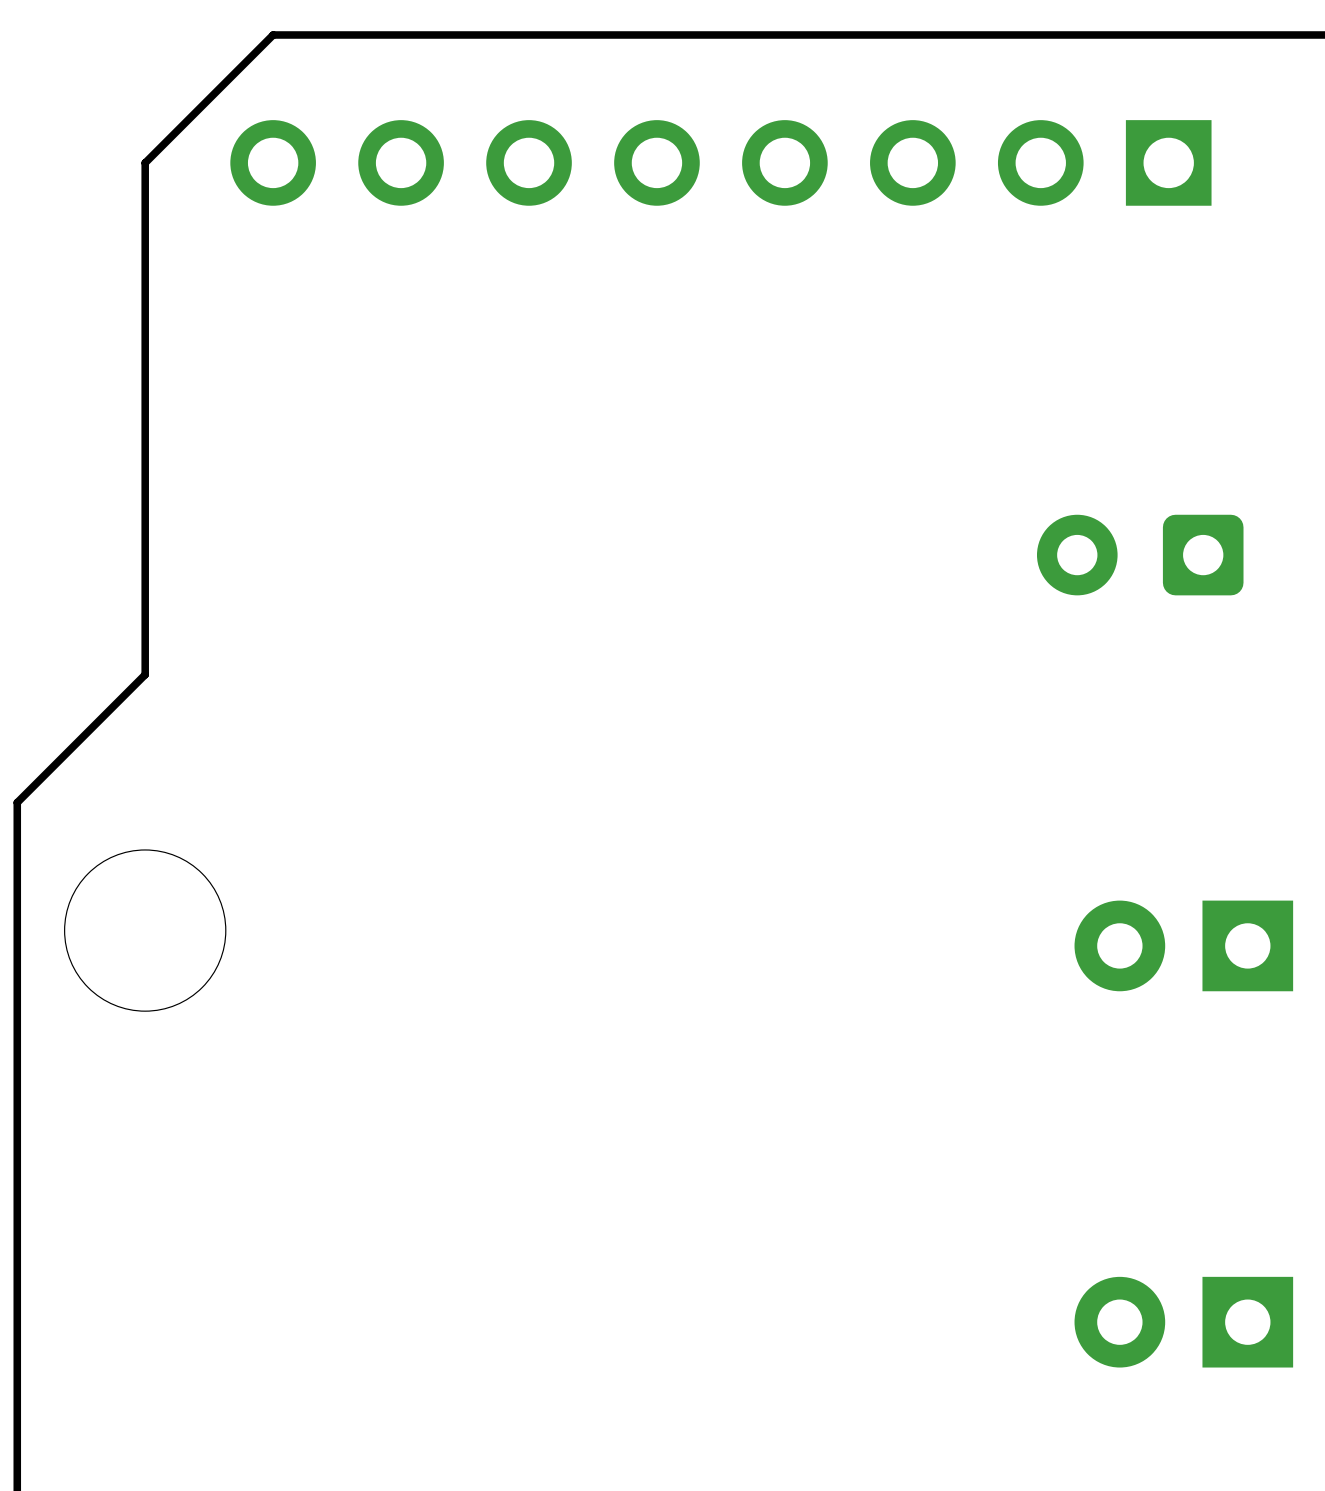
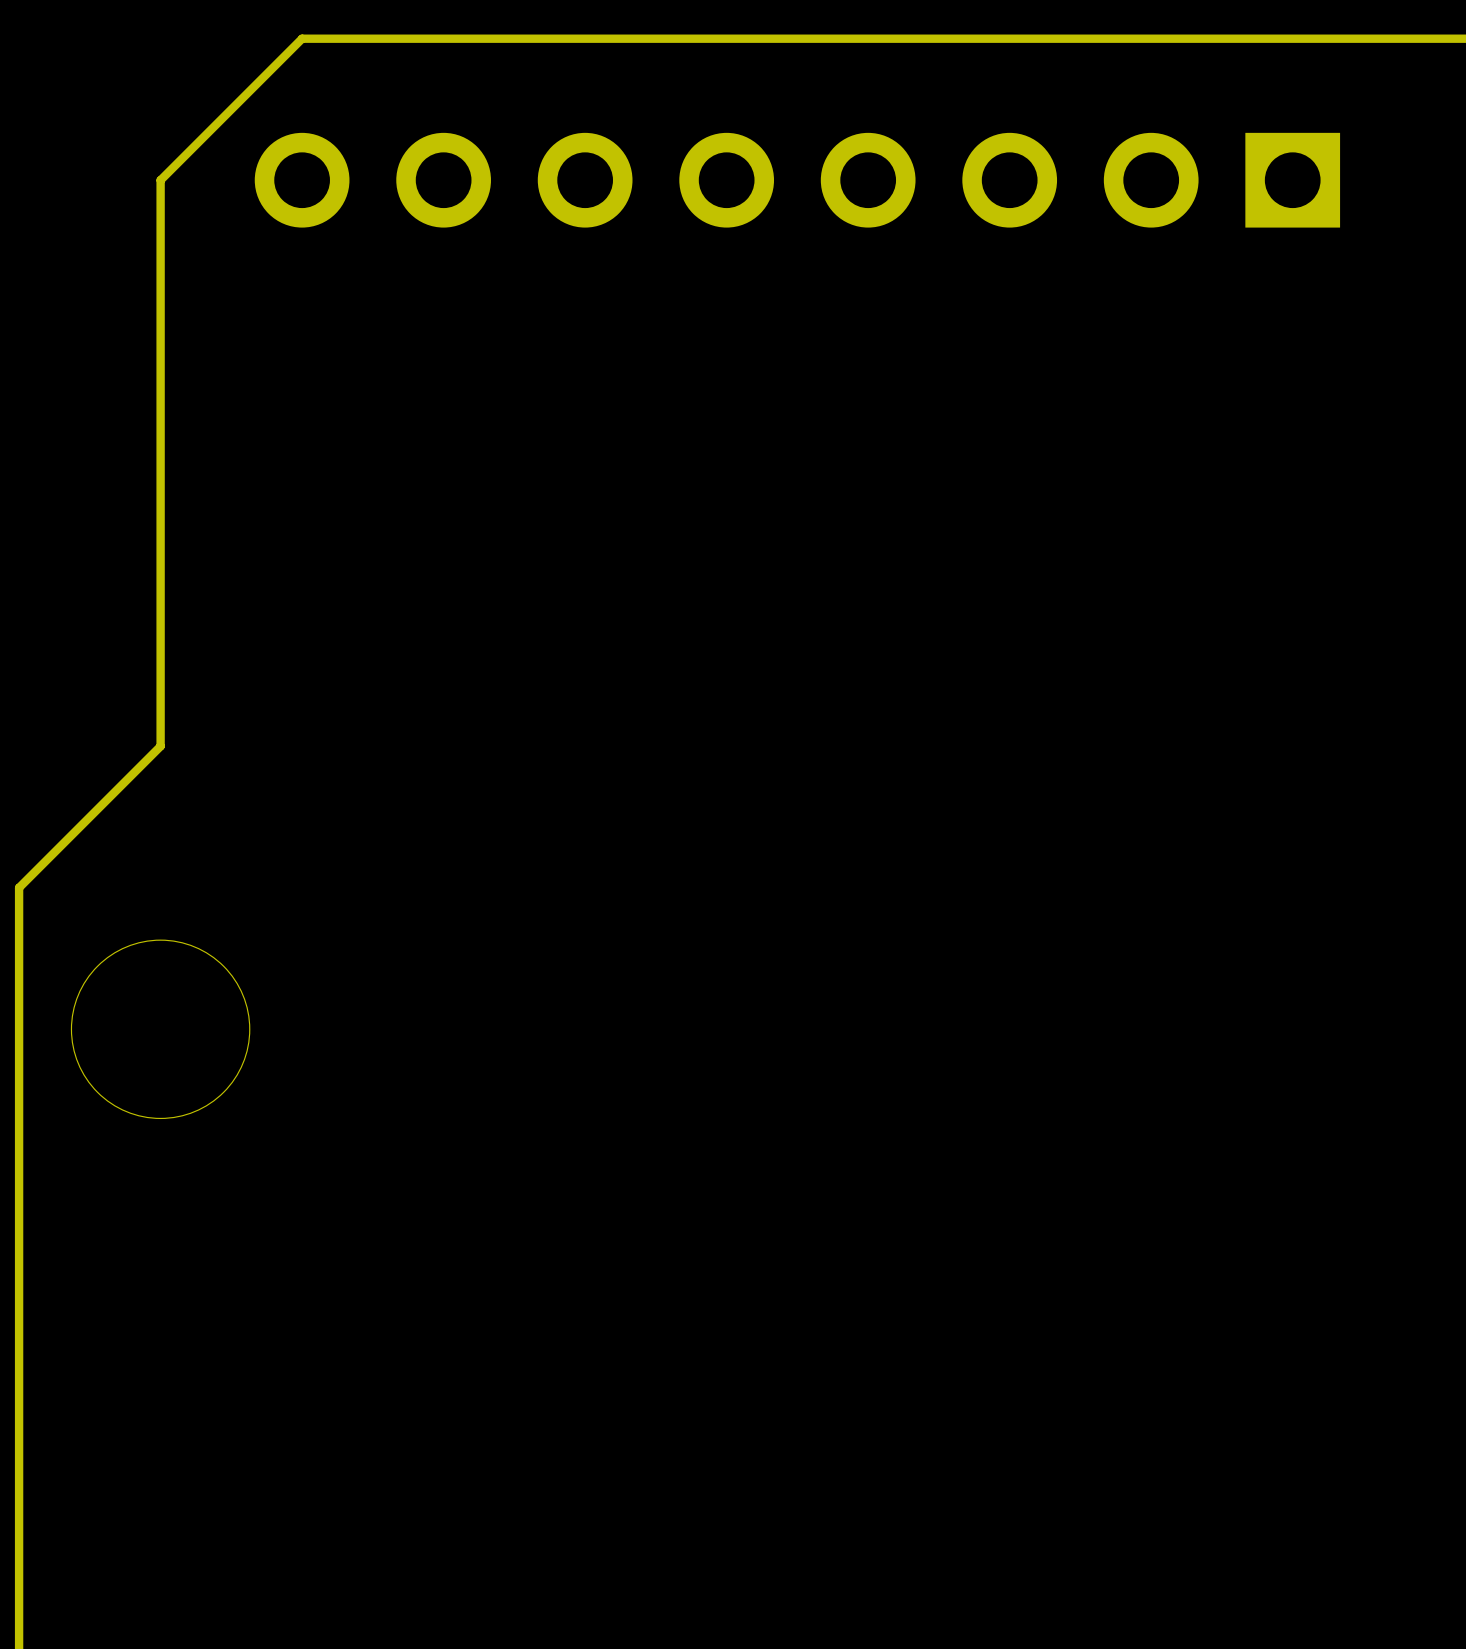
part: (1140, 555) -> none
part: (1183, 945) -> none
part: (1183, 1322) -> none

